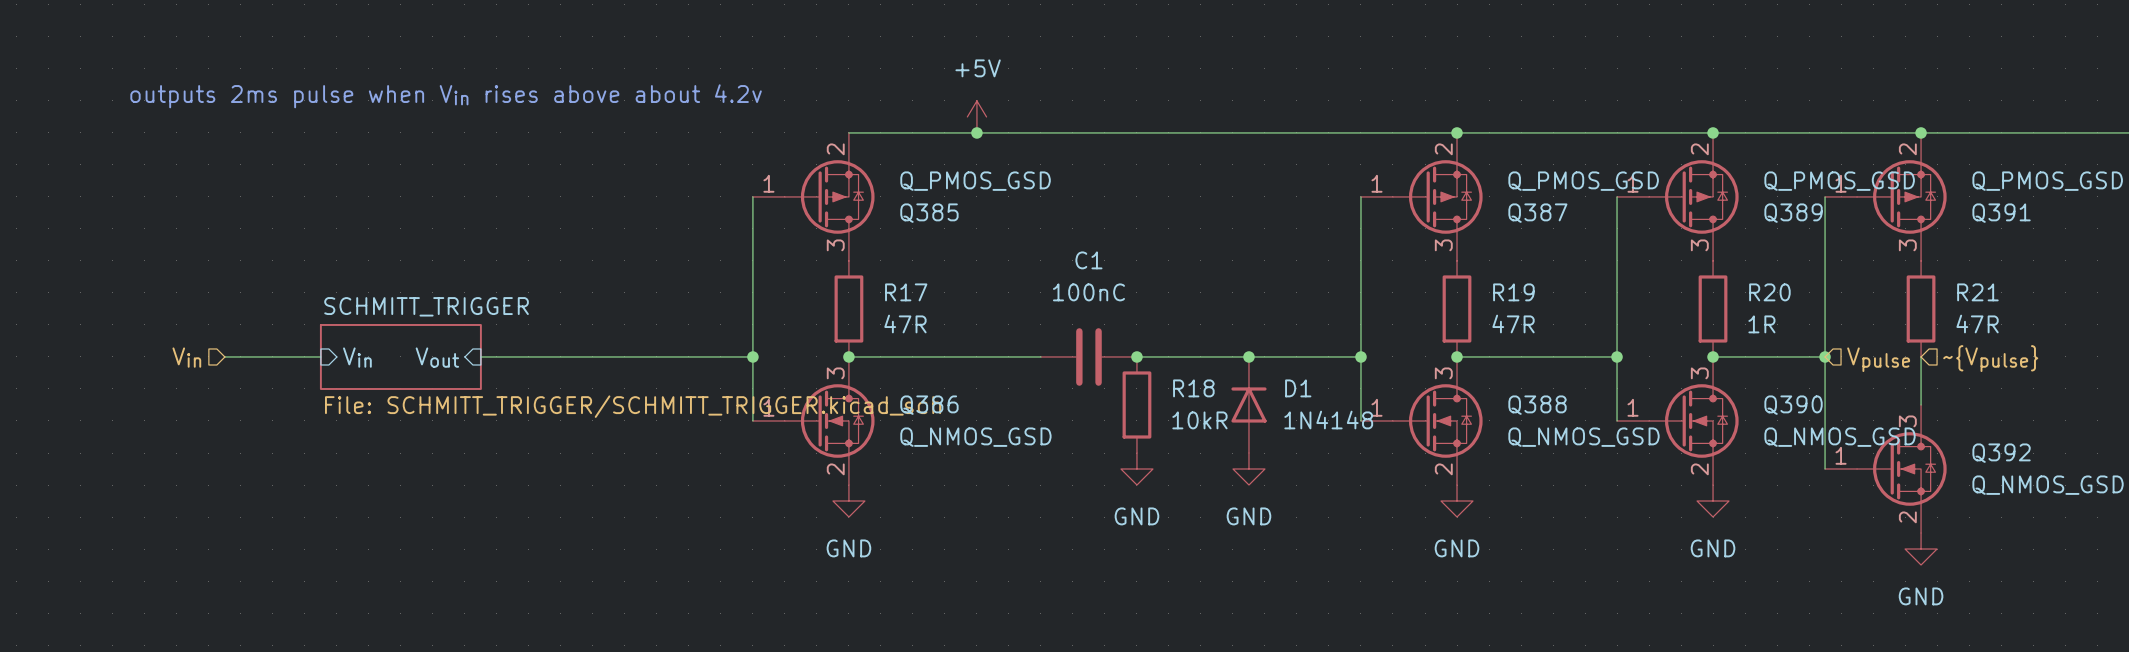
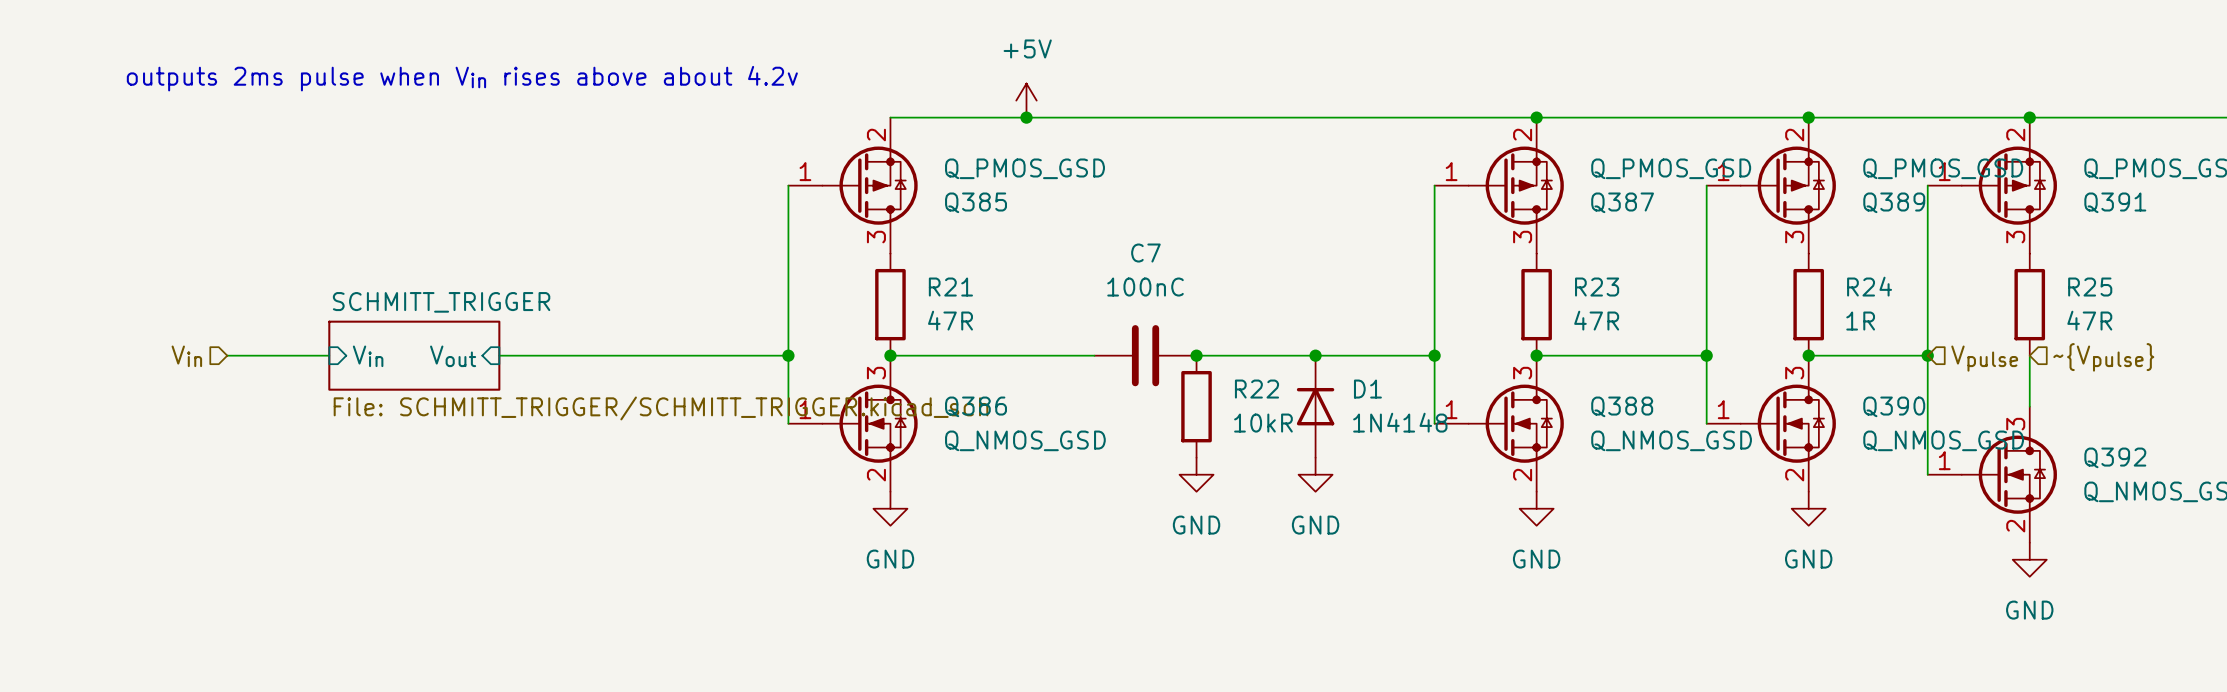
C1 name: C1 (1088, 260) -> C7 (1145, 253)
R17 name: R17 (906, 292) -> R21 (950, 287)
R19 name: R19 (1513, 292) -> R23 (1597, 287)
R20 name: R20 (1769, 292) -> R24 (1869, 286)
R21 name: R21 (1977, 292) -> R25 (2090, 287)
R18 name: R18 (1193, 388) -> R22 (1256, 389)

